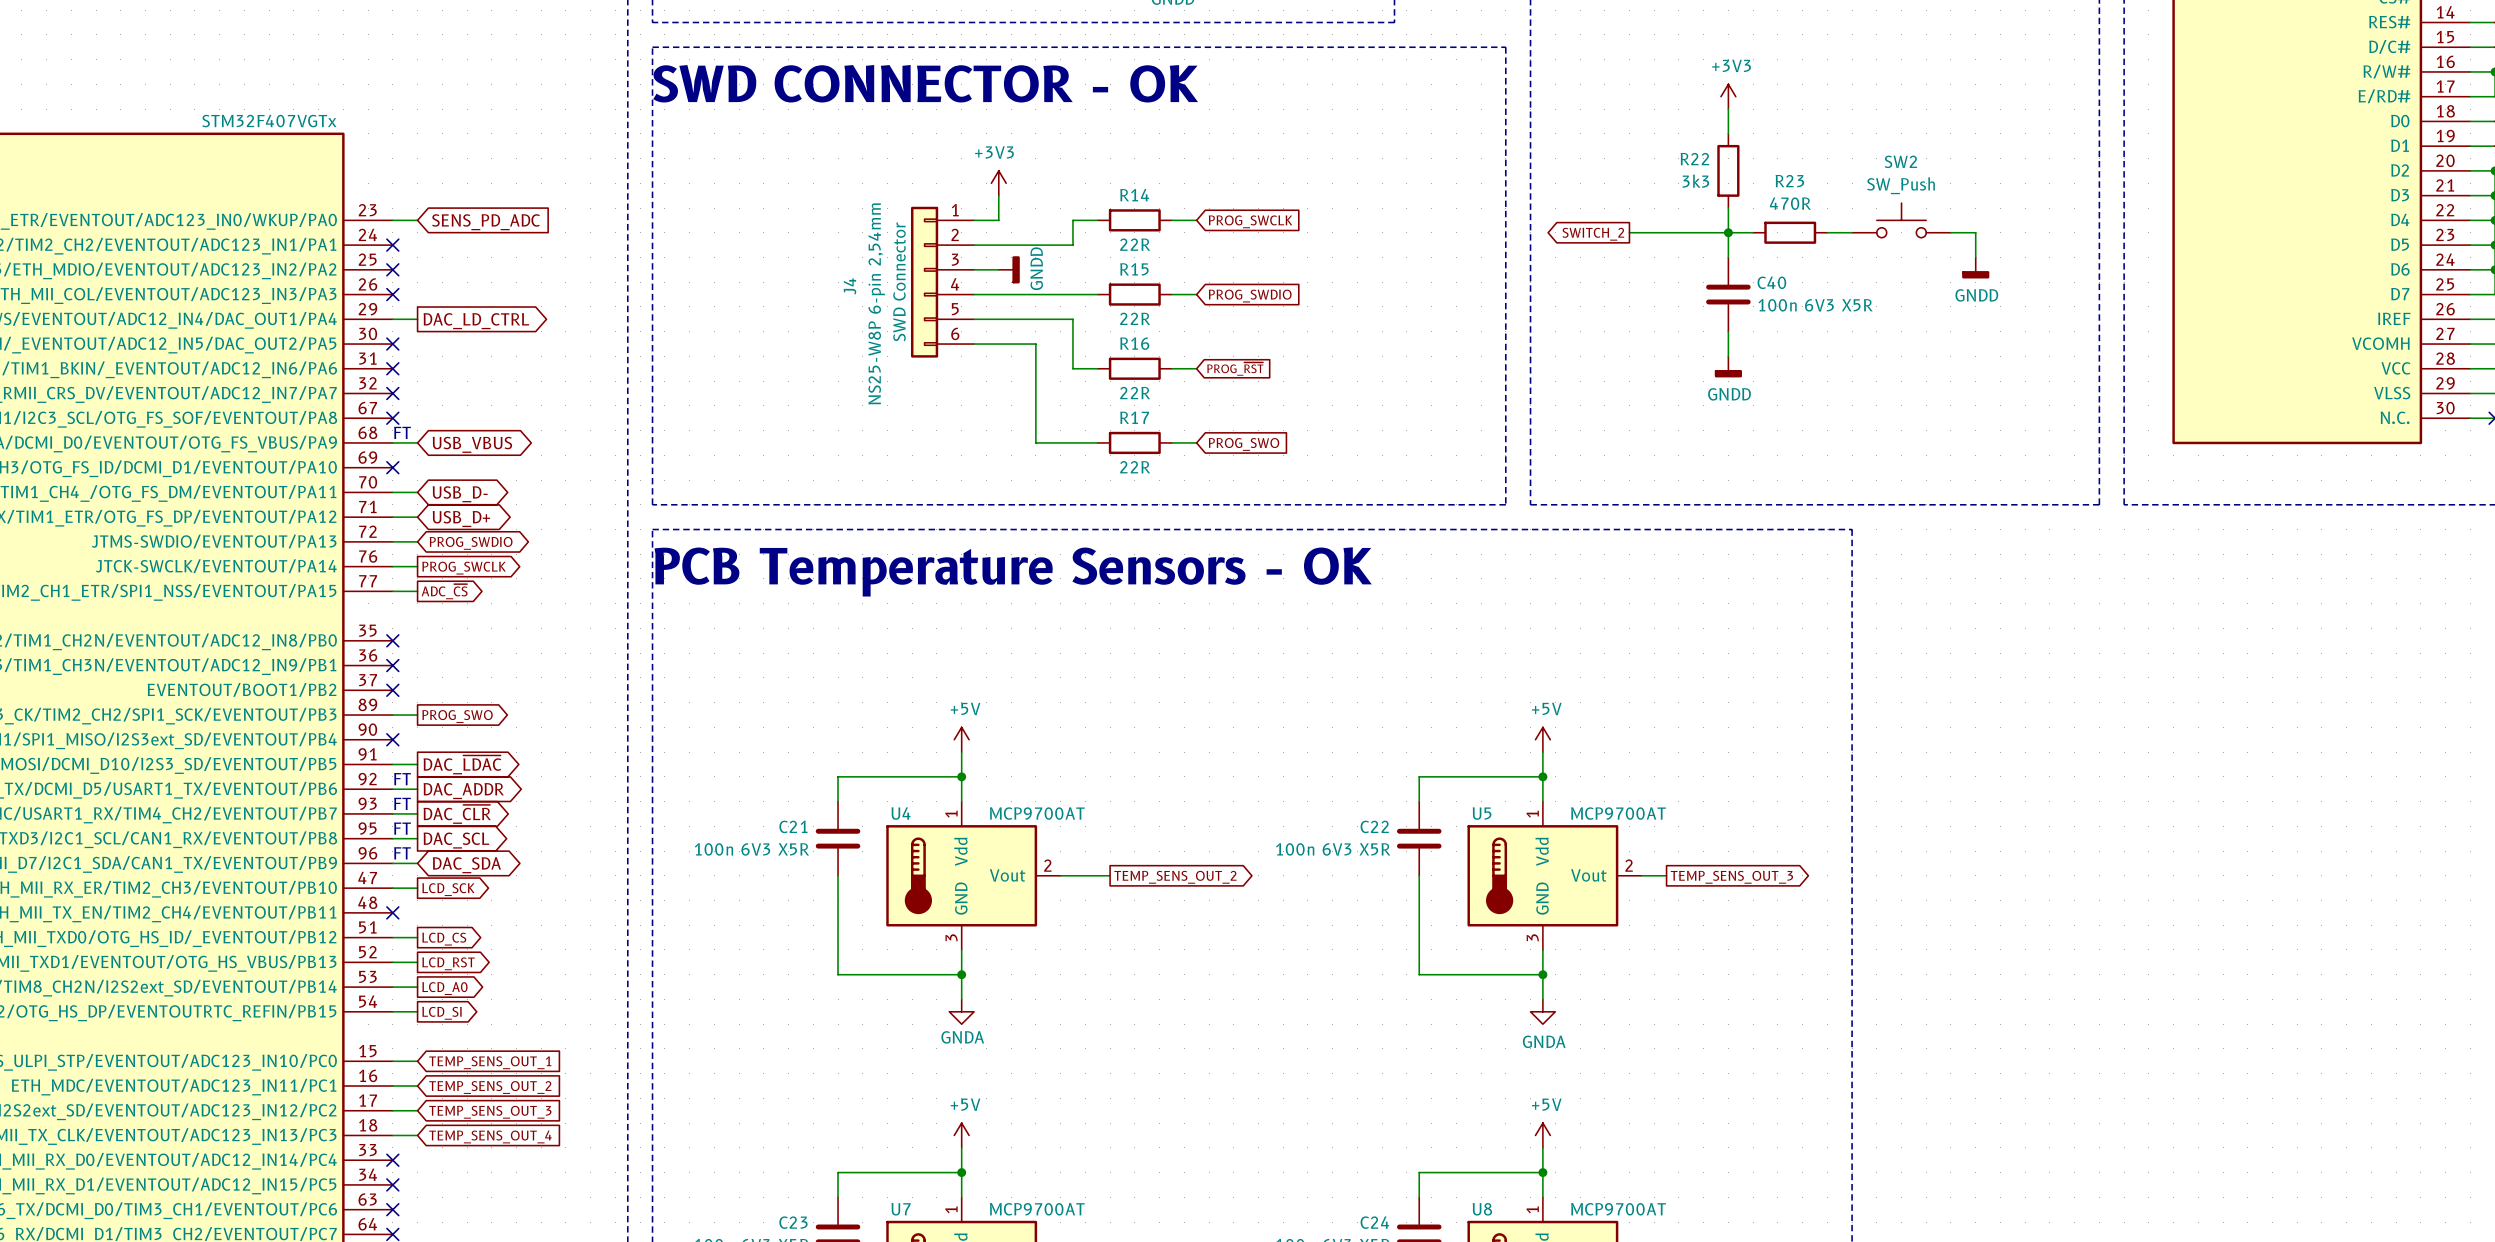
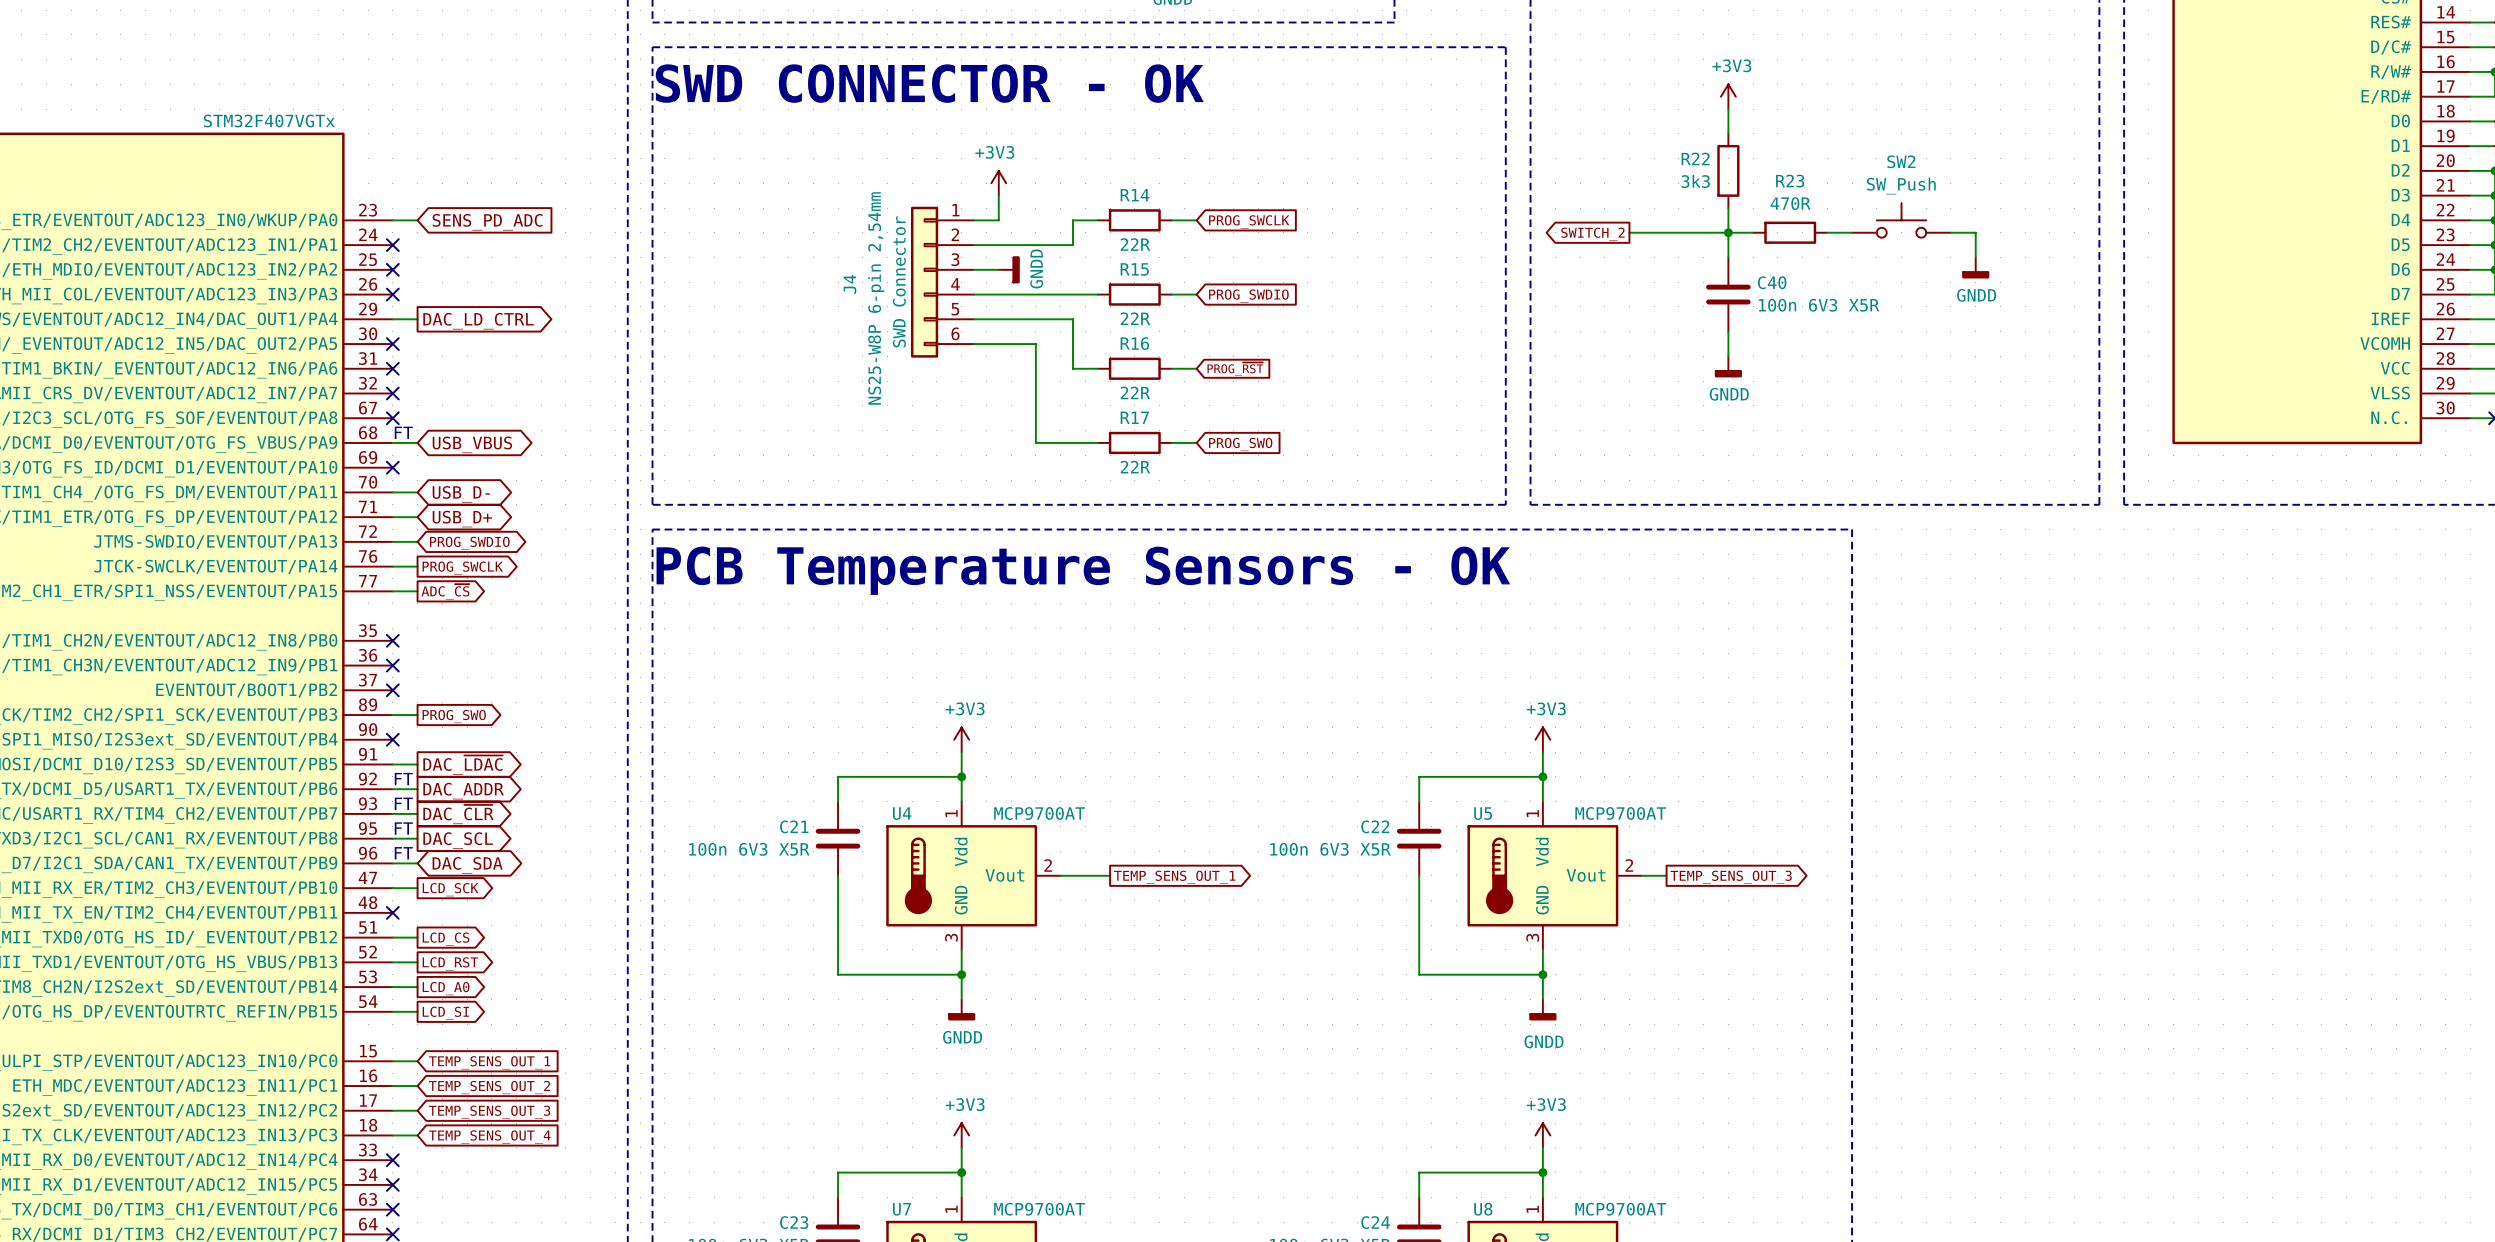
power symbol: +5V (961, 739) -> +3V3 (961, 739)
power symbol: +5V (1542, 739) -> +3V3 (1542, 739)
global label: TEMP_SENS_OUT_2 (1175, 877) -> TEMP_SENS_OUT_1 (1174, 877)
power symbol: GNDA (961, 1011) -> GNDD (961, 1009)
power symbol: GNDA (1542, 1011) -> GNDD (1542, 1009)
power symbol: +5V (961, 1135) -> +3V3 (961, 1135)
power symbol: +5V (1542, 1135) -> +3V3 (1542, 1135)

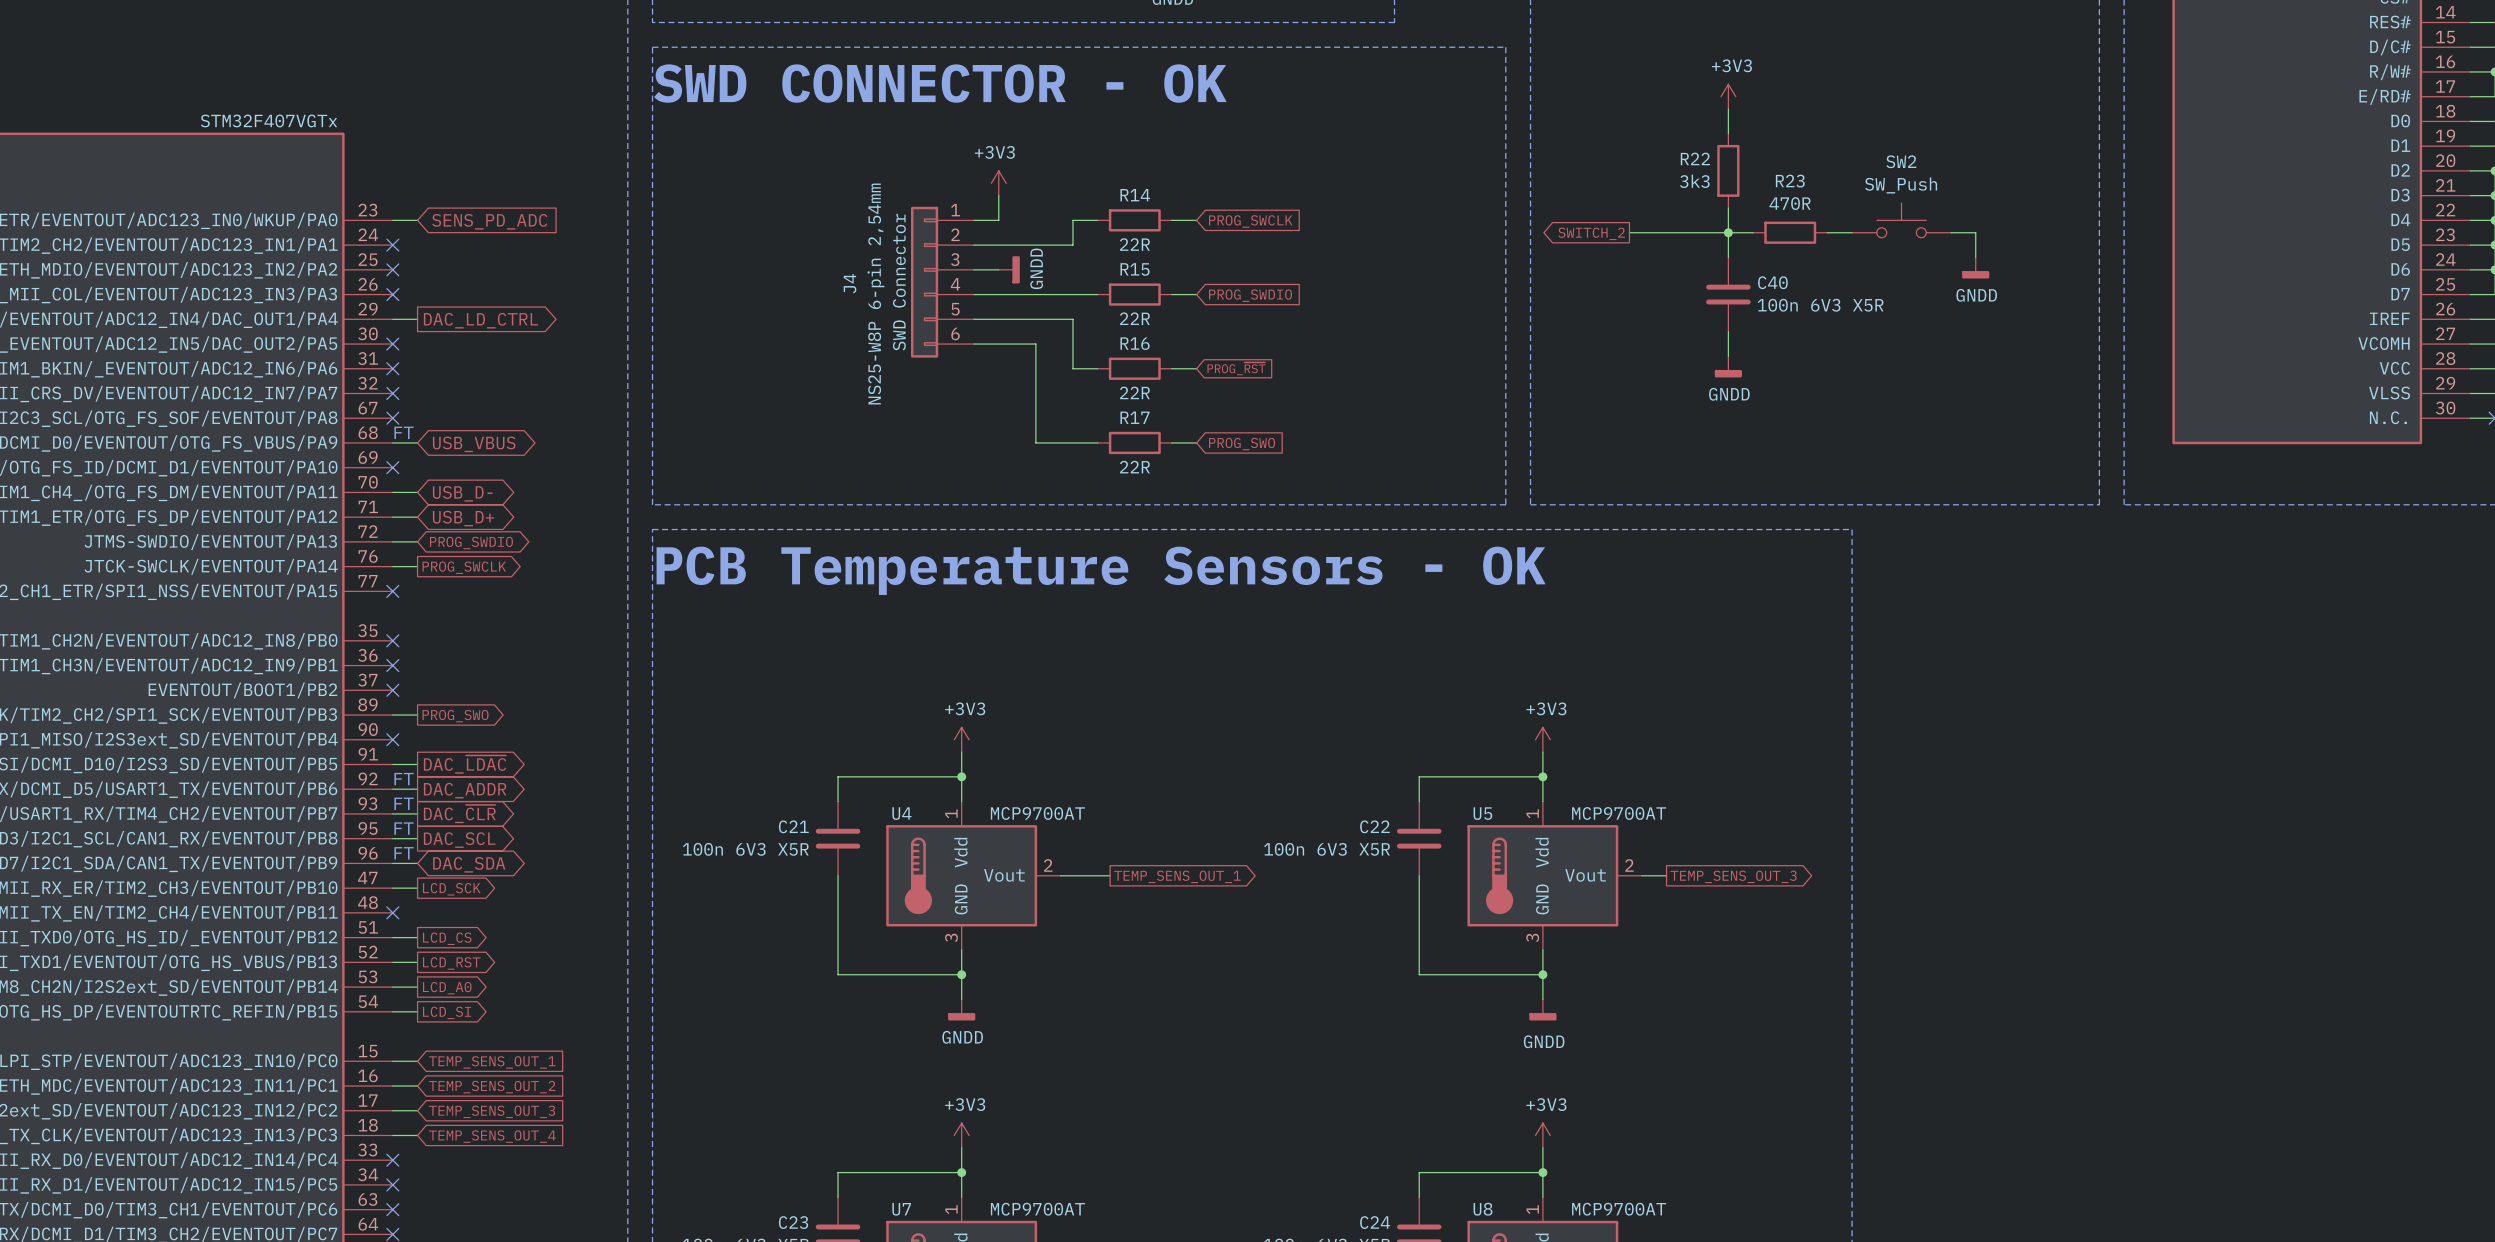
wire: (392, 591) (417, 591) -> none
no-connect mark: none -> (392, 591)
global label: ADC_~{CS} (445, 591) -> none

